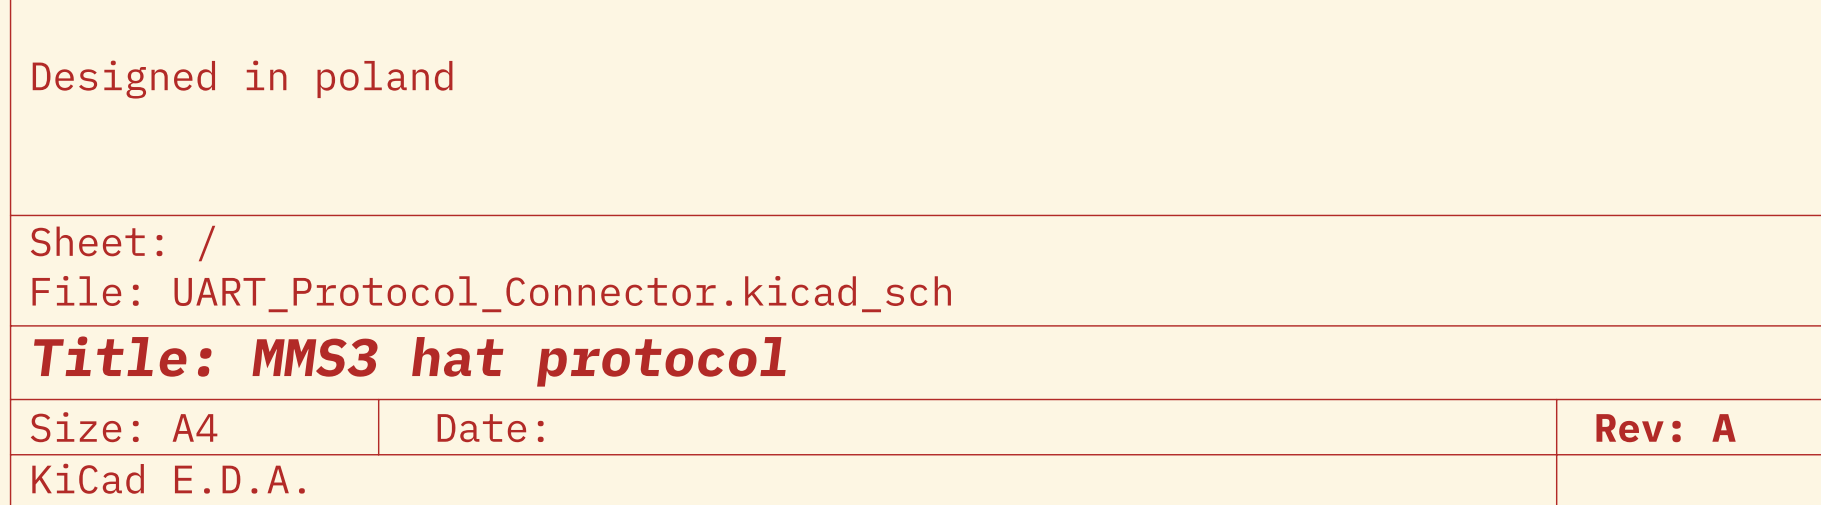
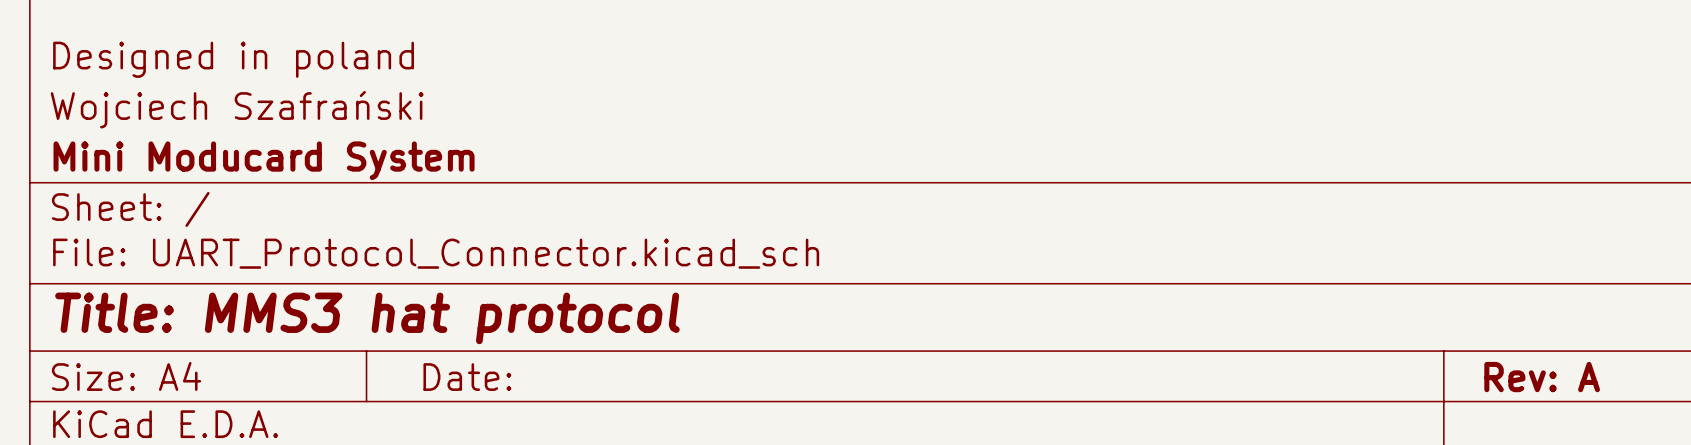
title block: none -> Wojciech Szafrański (237, 109)
title block: none -> Mini Moducard System (264, 160)

